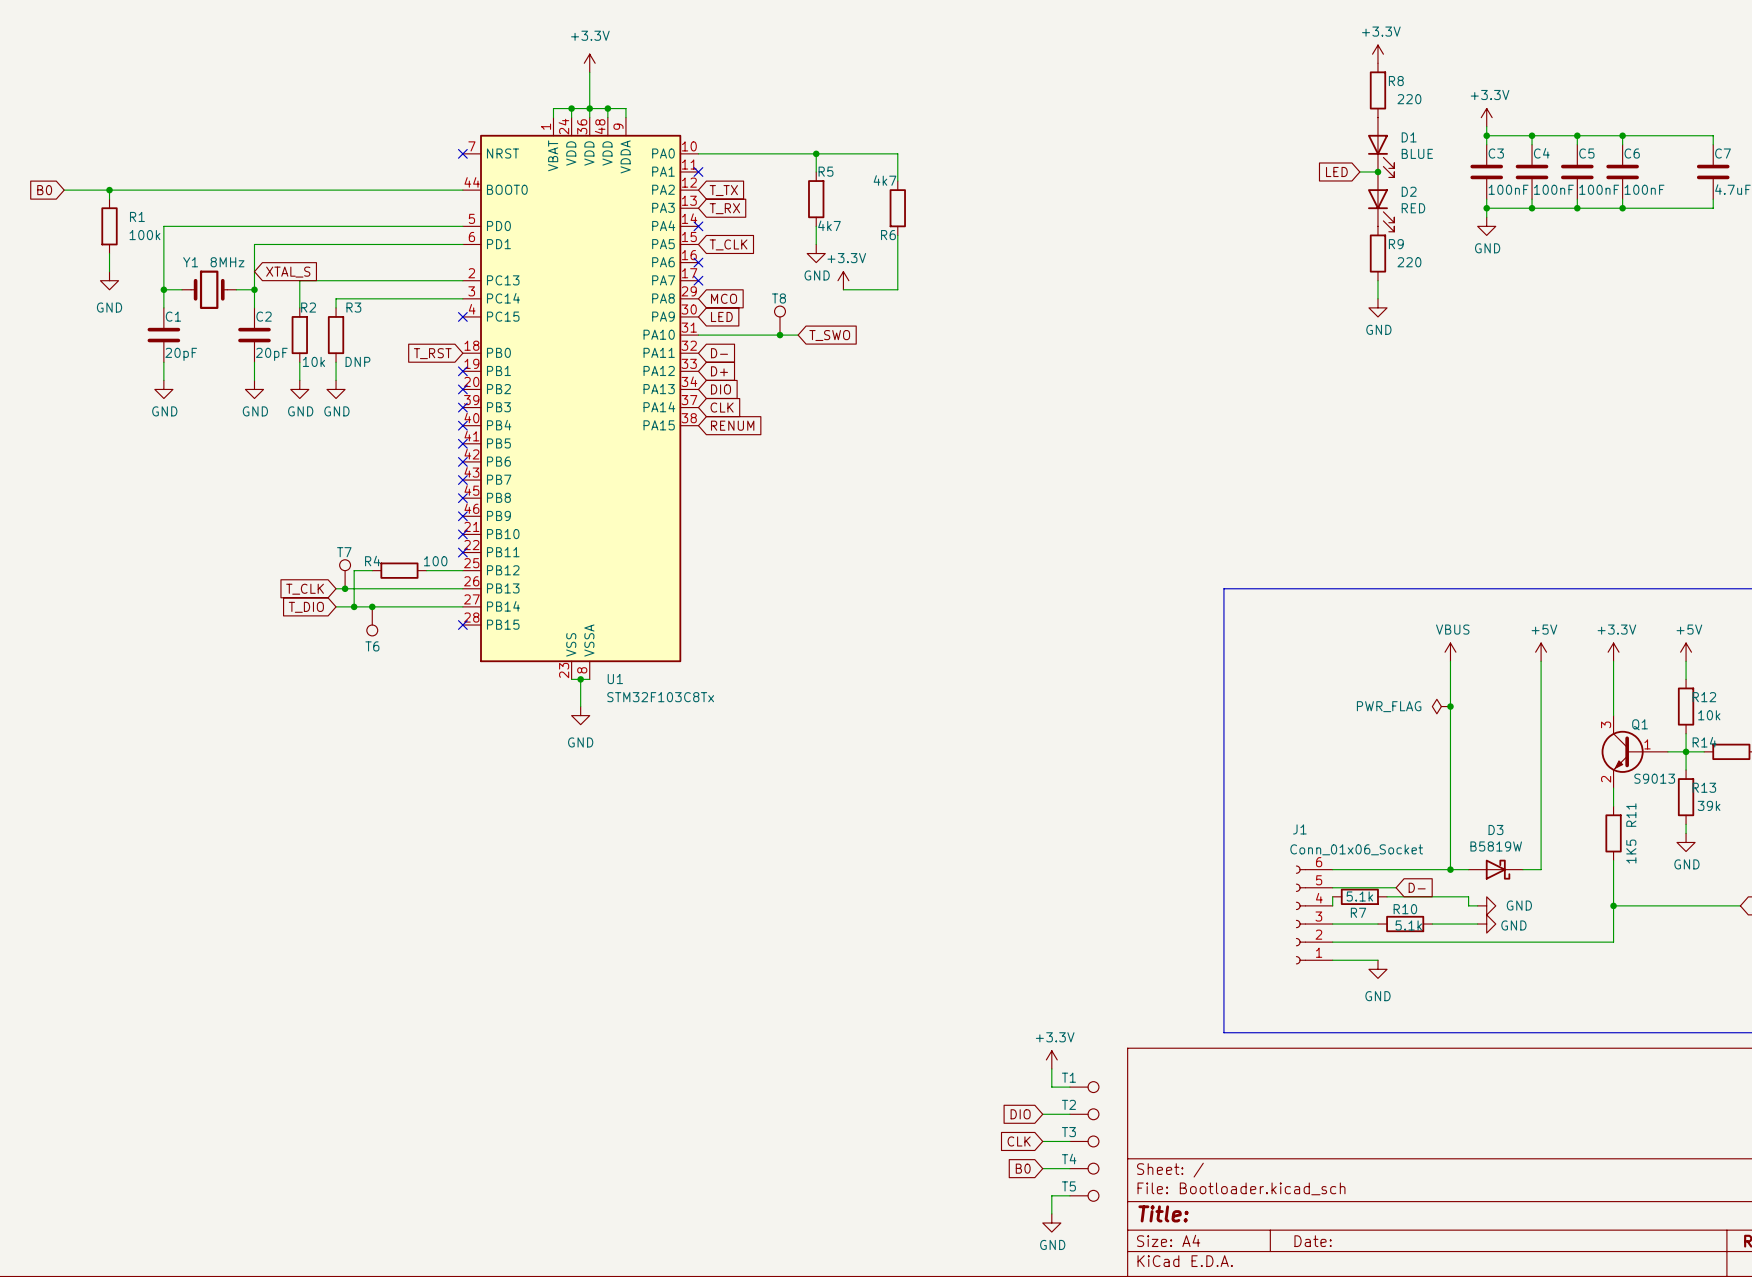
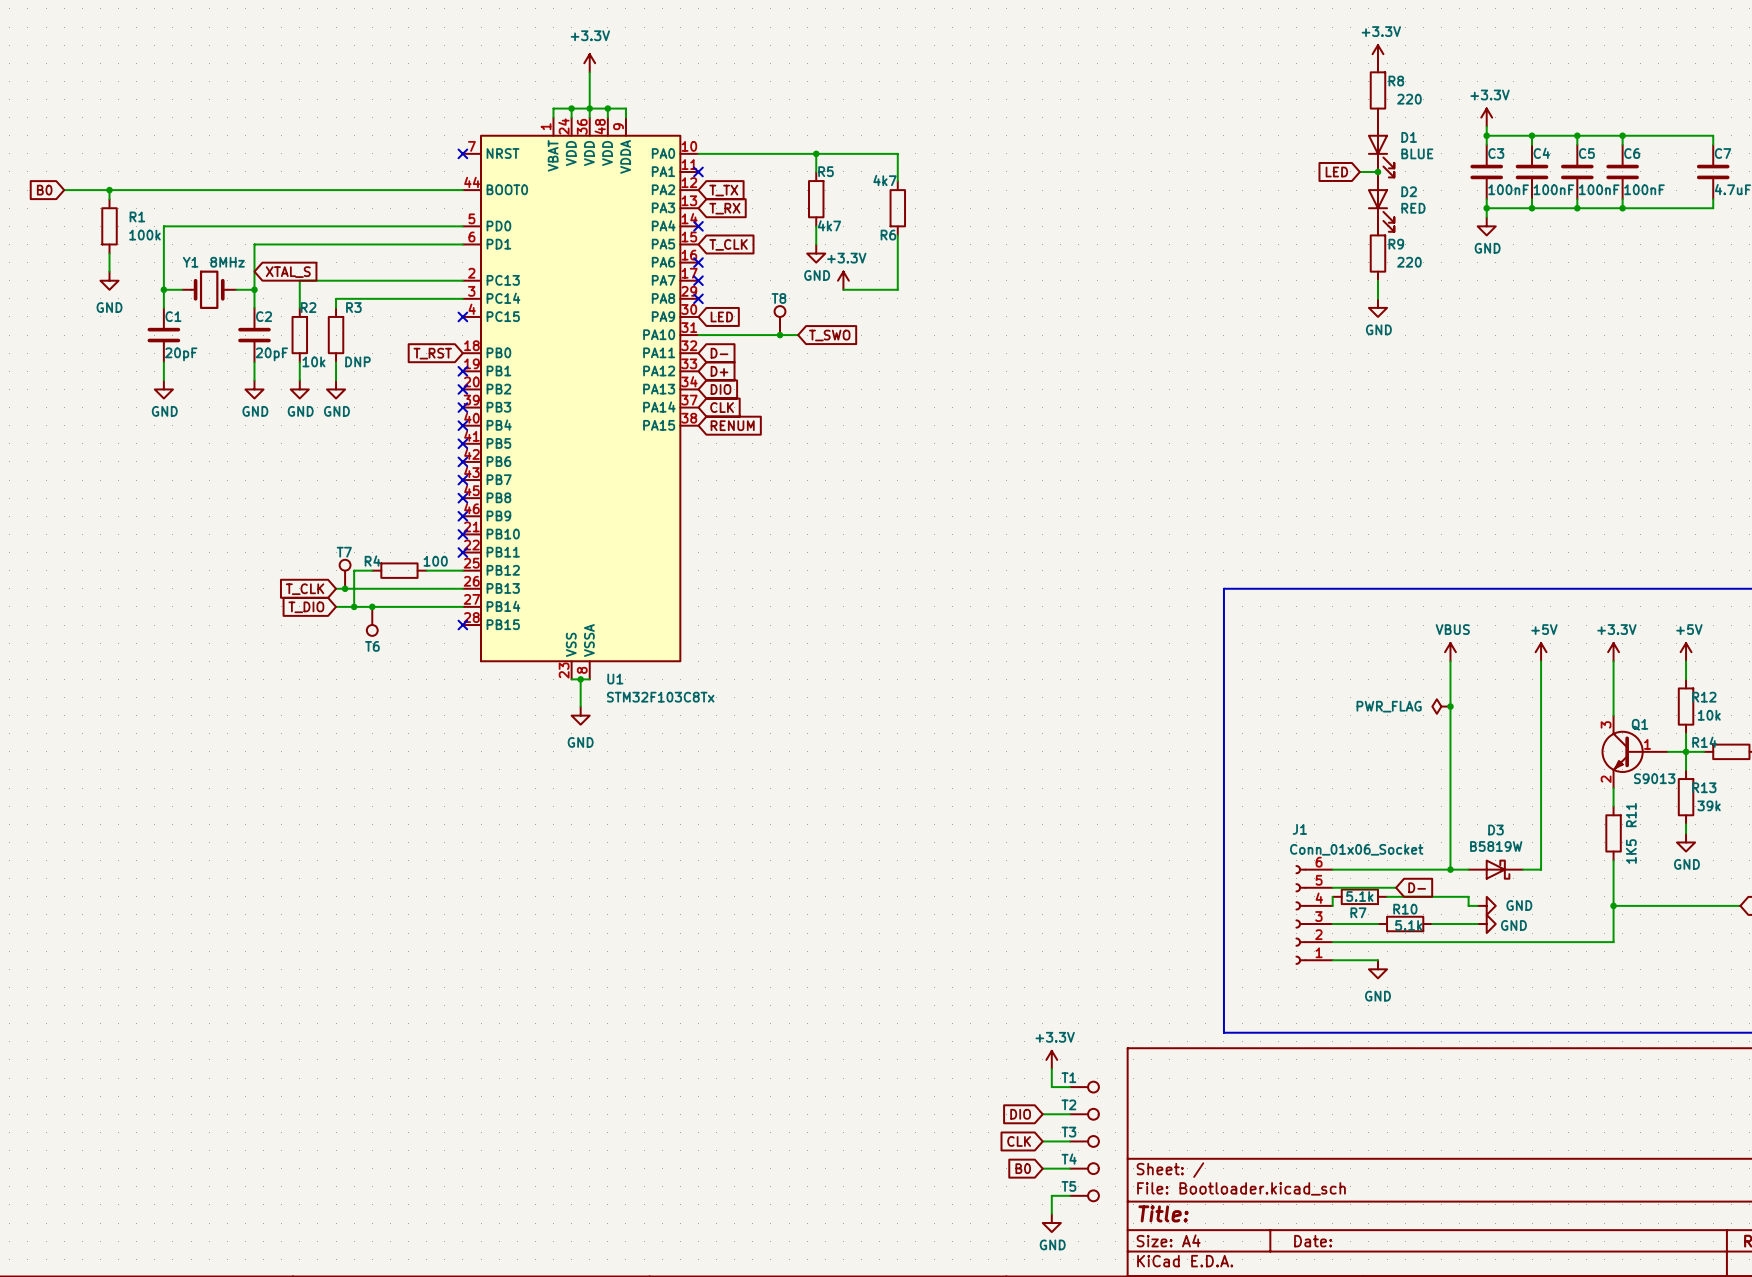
no-connect mark: none -> (698, 298)
global label: MCO (724, 298) -> none

